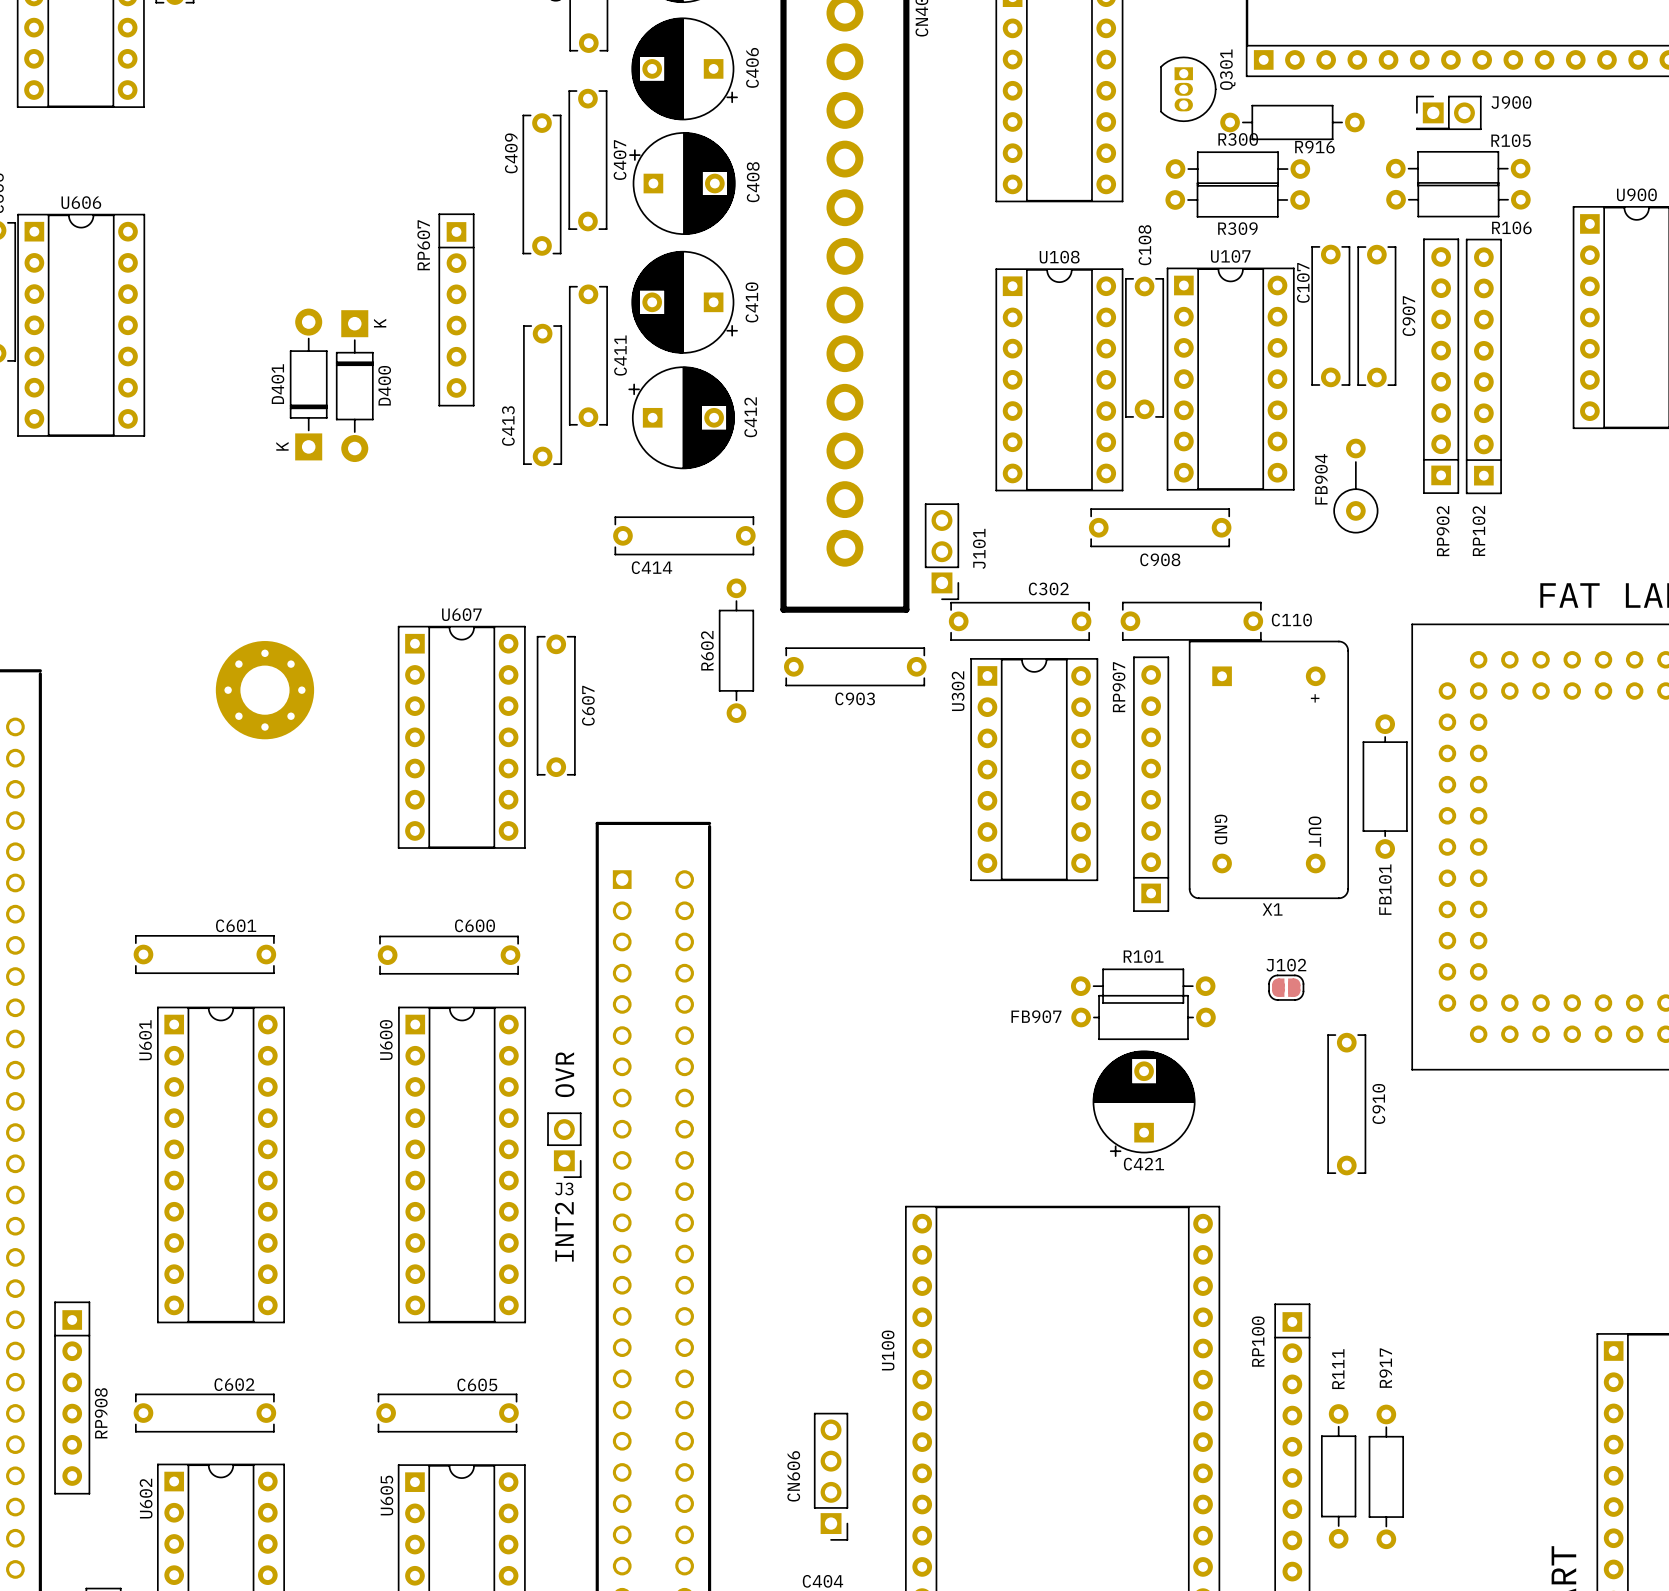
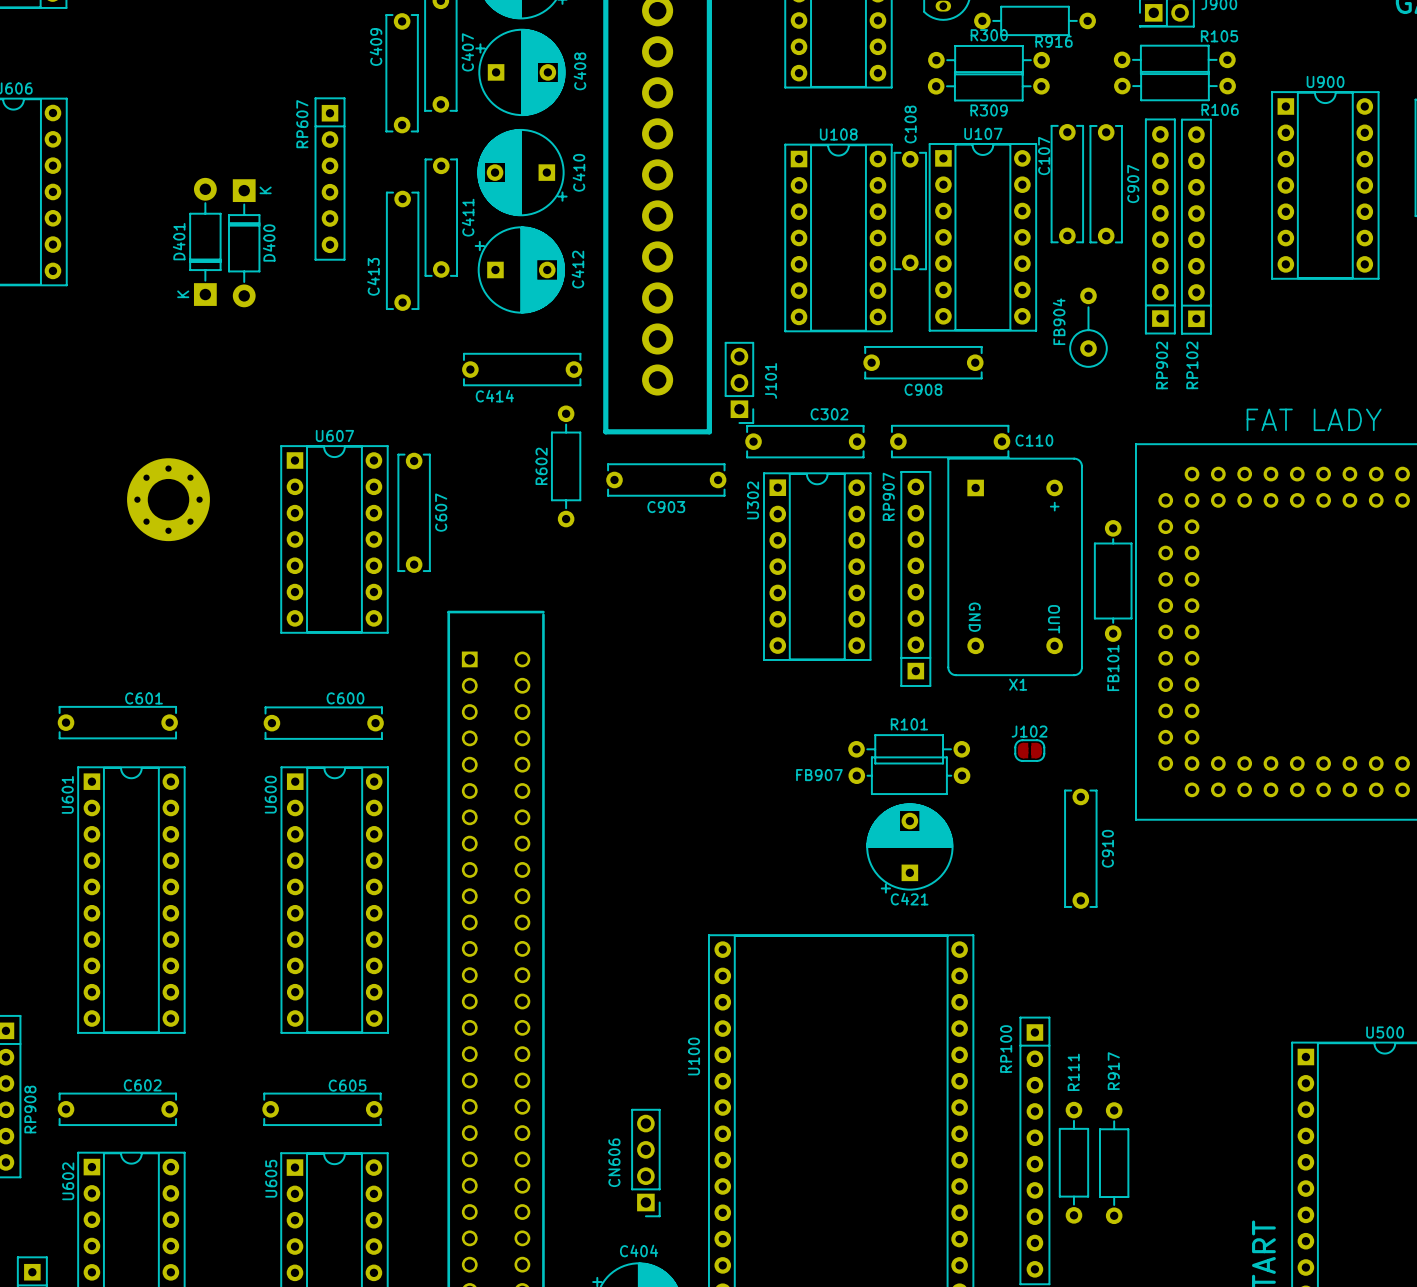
text: OVR (564, 1074) -> none
J3: (564, 1145) -> none
text: INT2 (564, 1231) -> none

